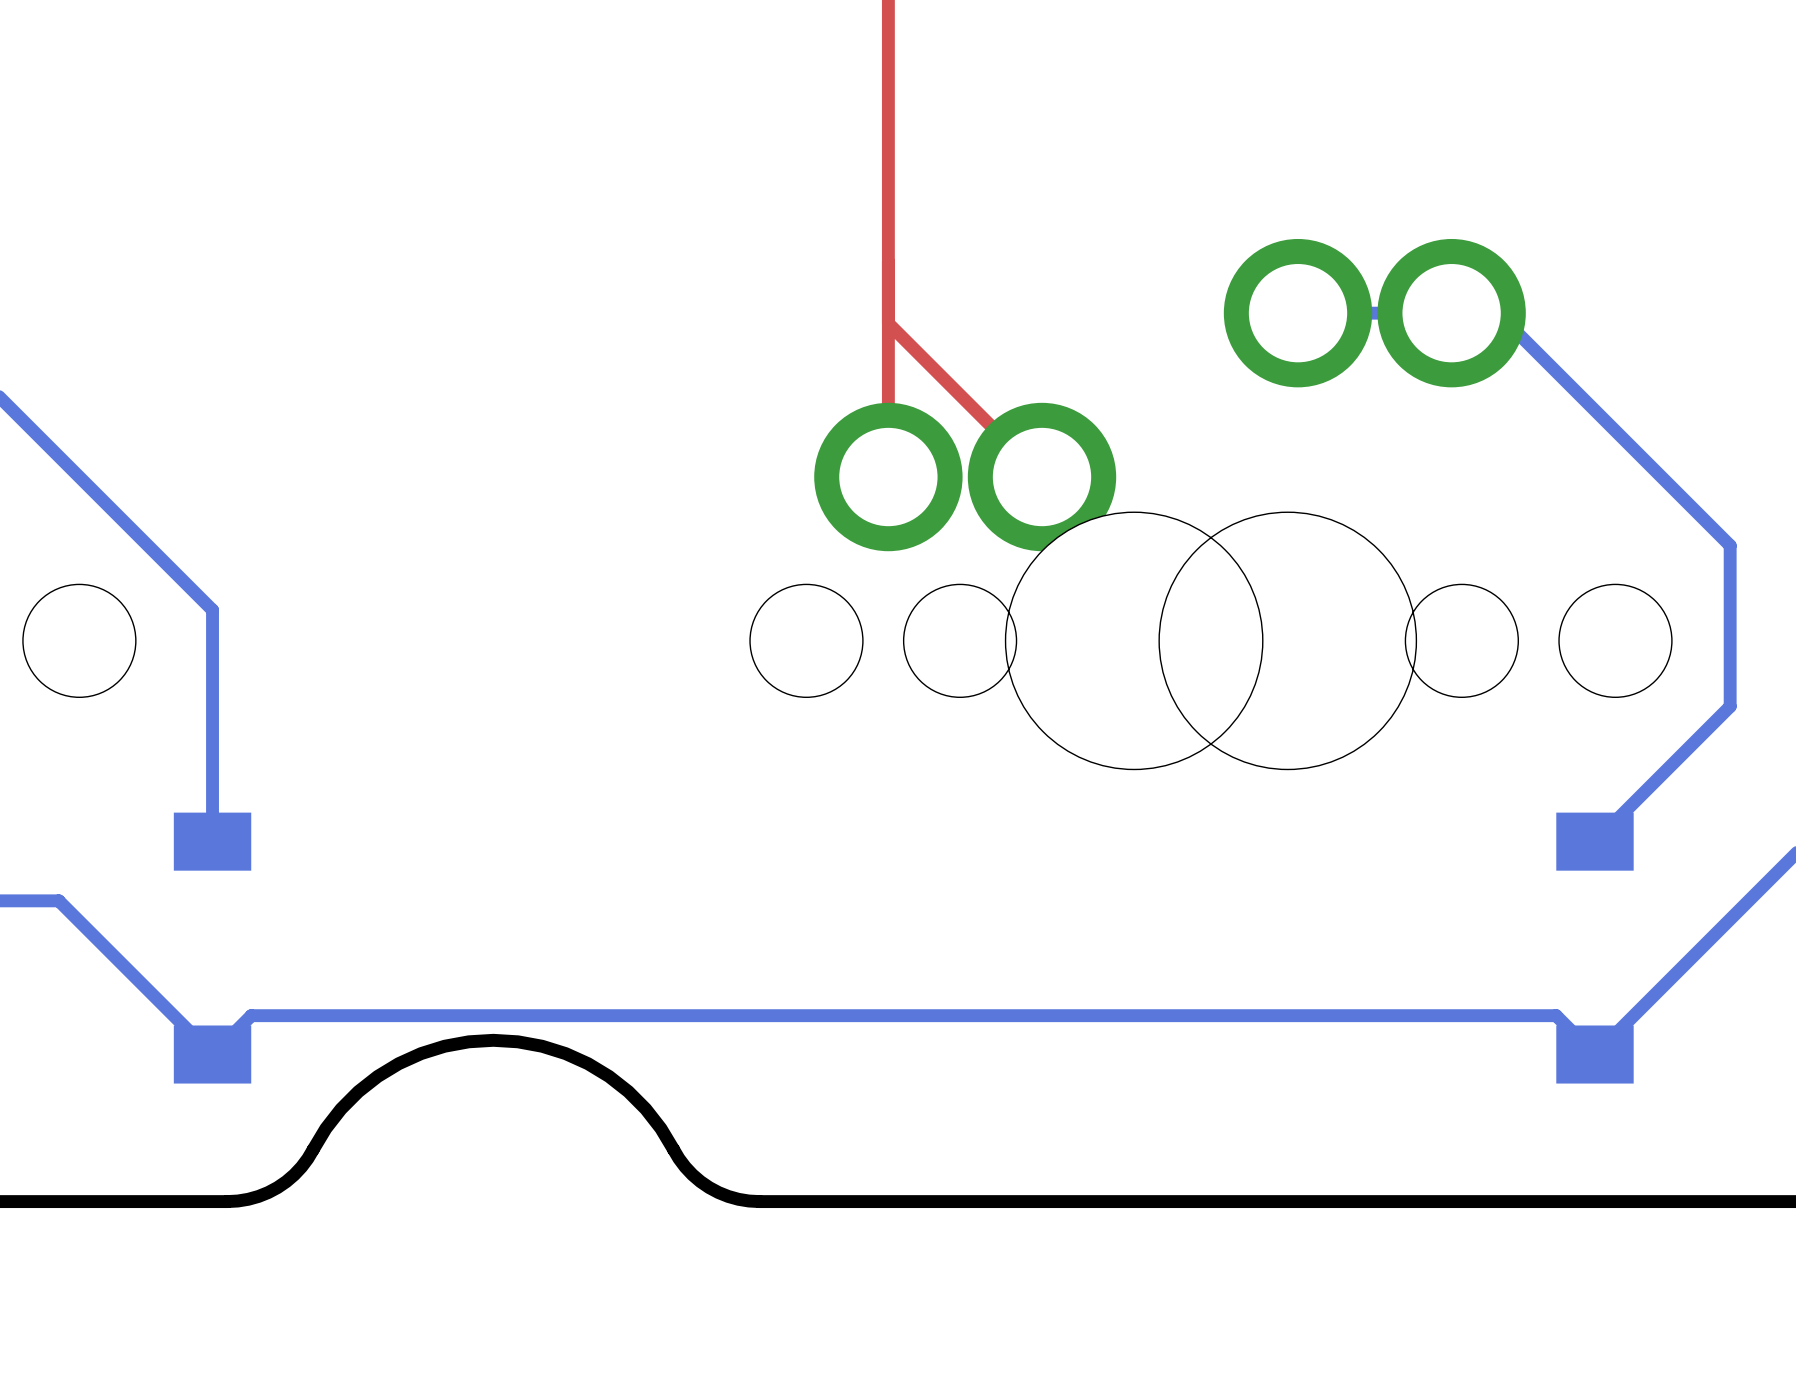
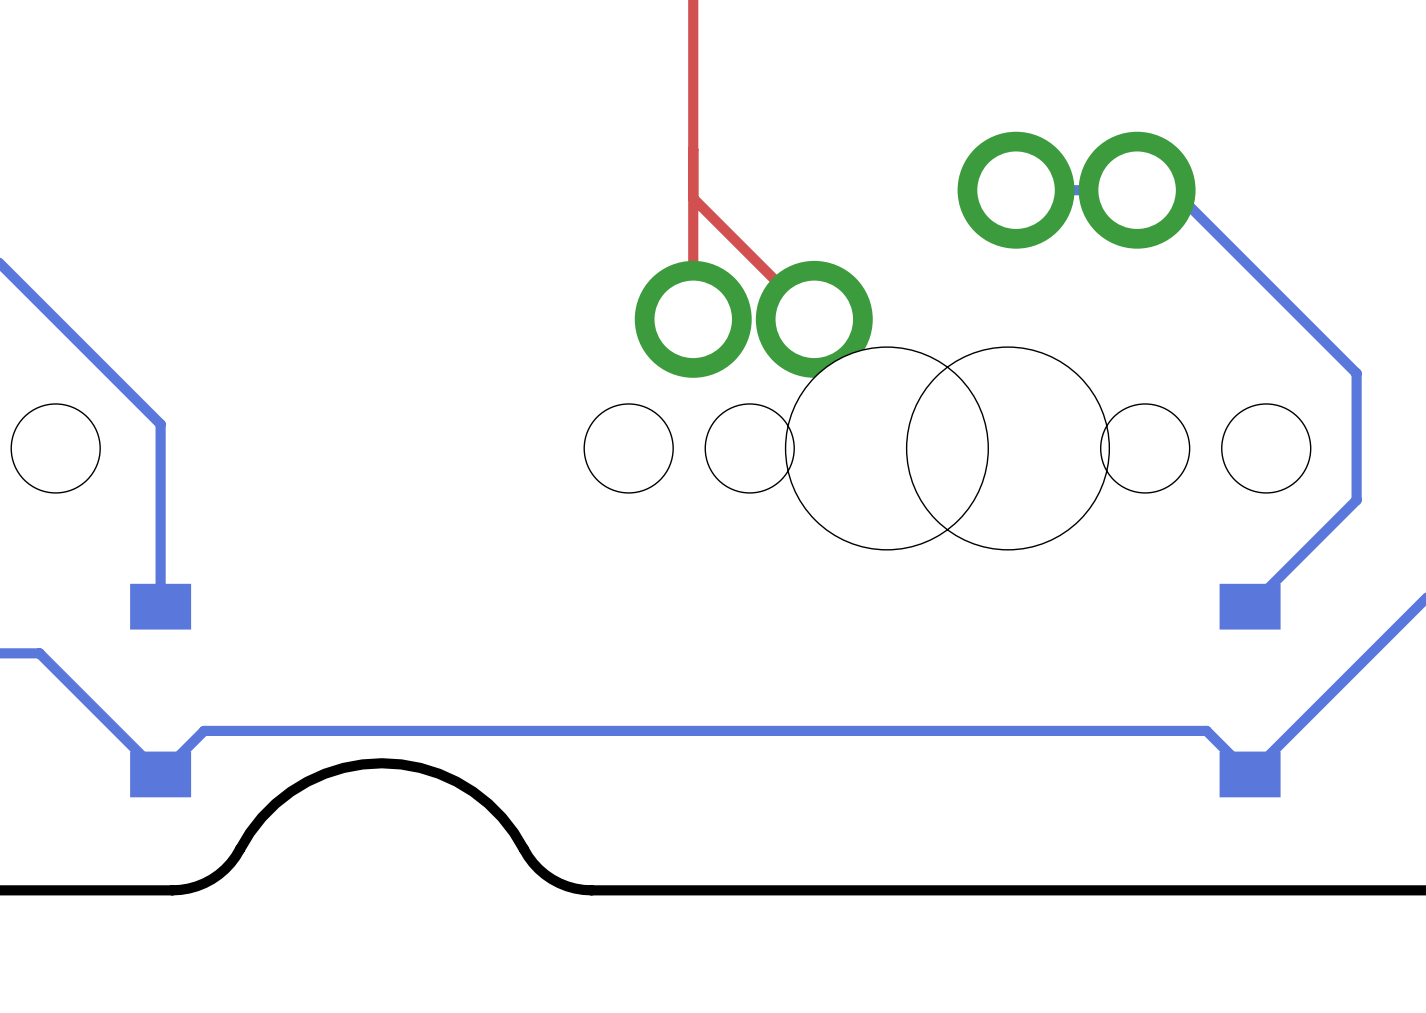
bottom track: (251, 1015) (1556, 1015) -> (191, 743) (204, 730) (1206, 730) (1219, 743)

